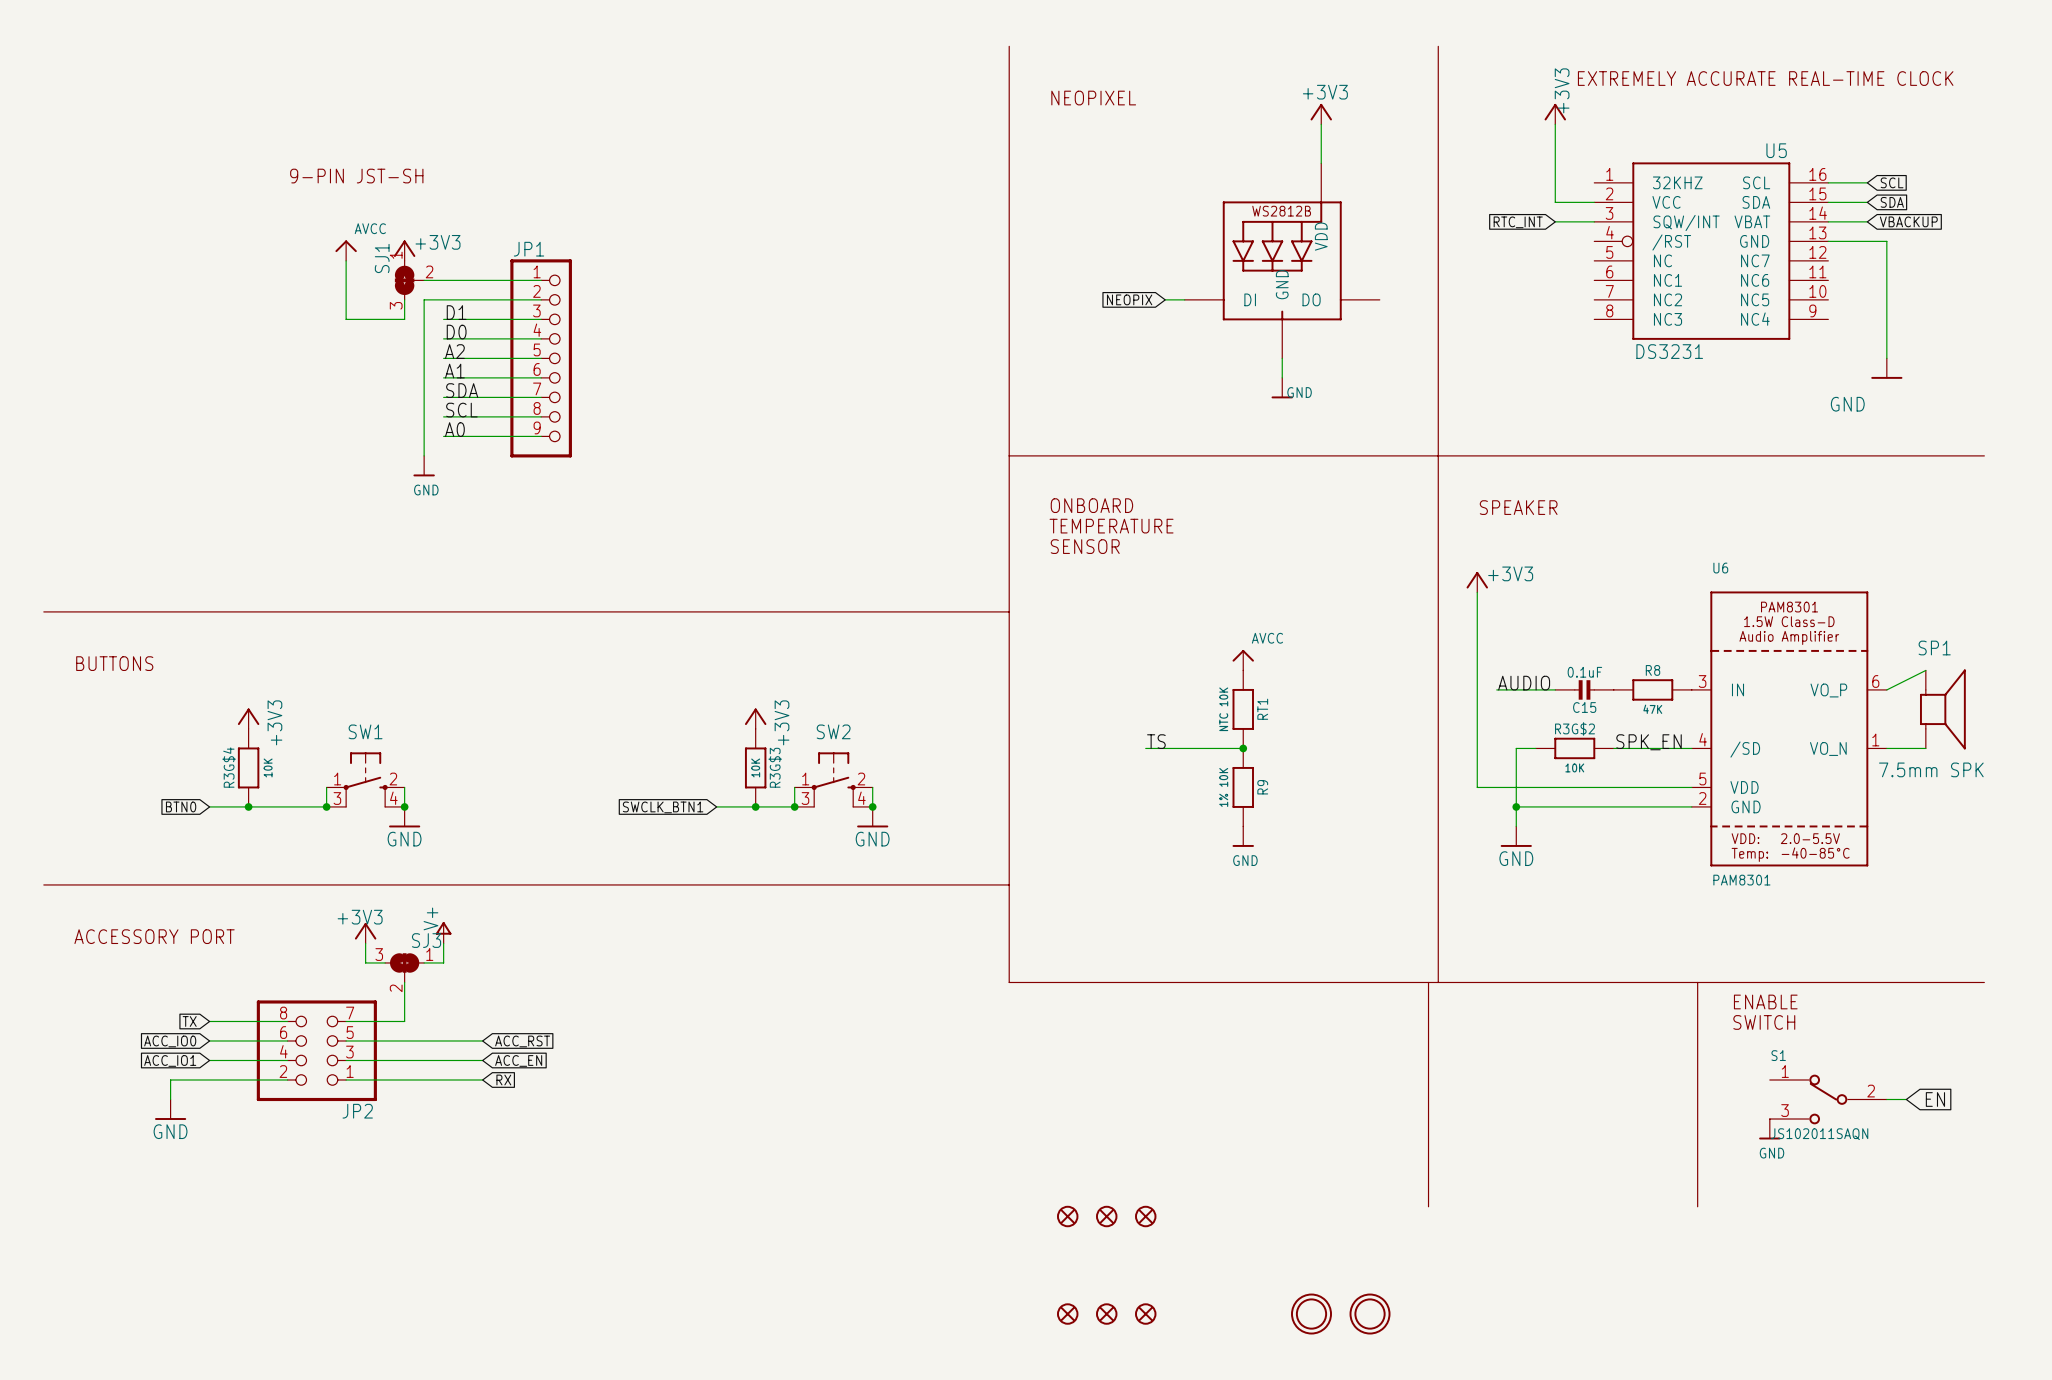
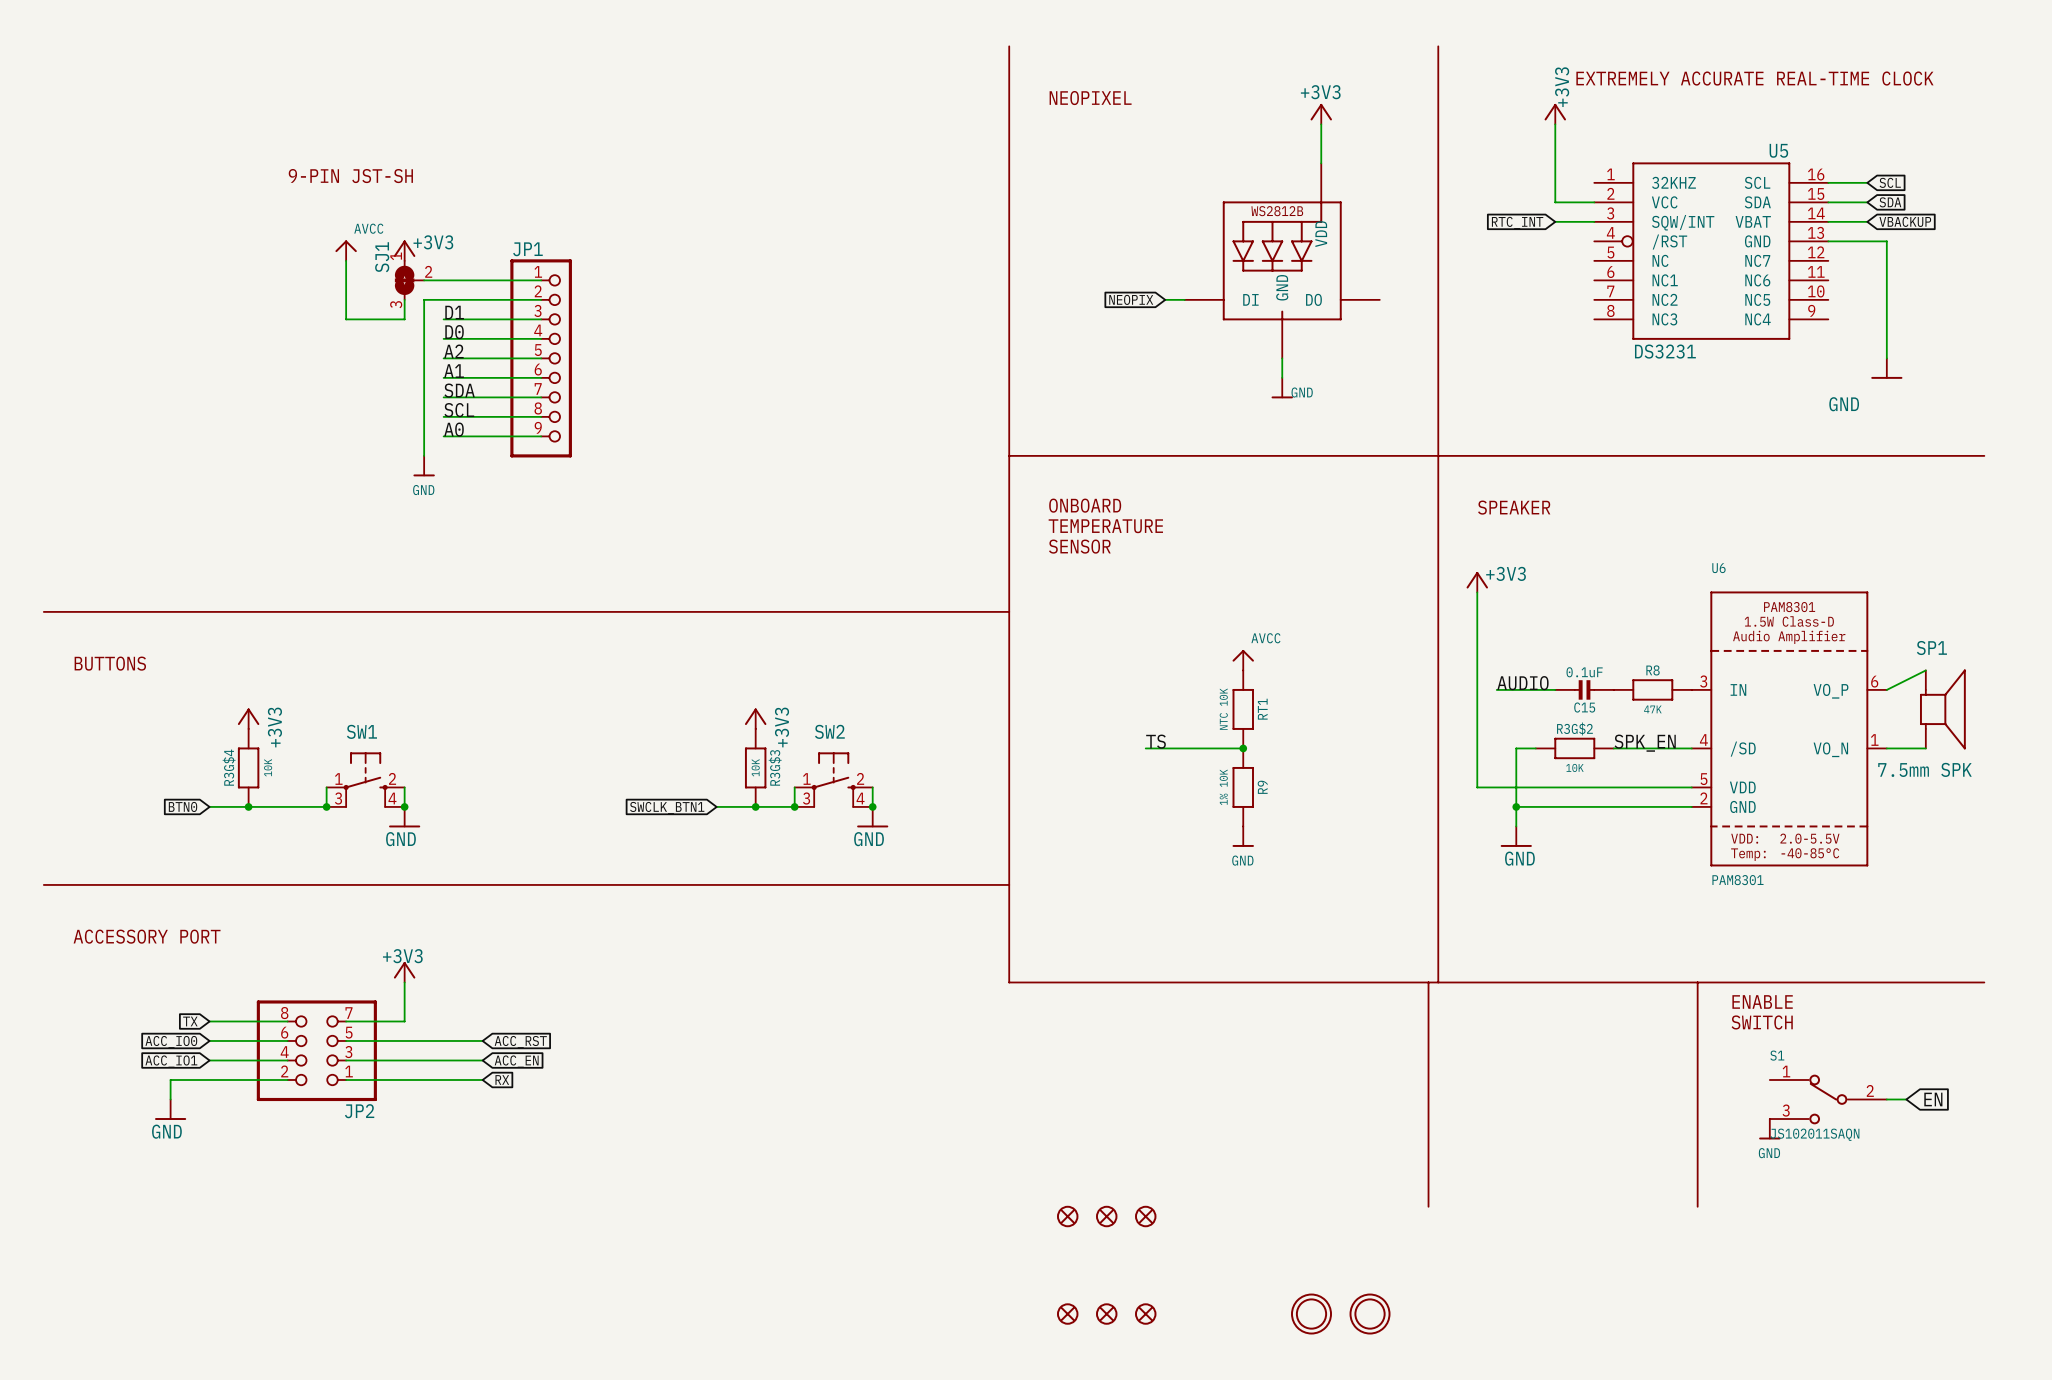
power symbol: V+ (443, 932) -> none
power symbol position: +3V3 (365, 933) -> +3V3 (404, 972)
wire: (365, 943) (365, 962) (385, 962) -> none
wire: (443, 943) (443, 962) (424, 962) -> none
SJ3: (404, 968) -> none

